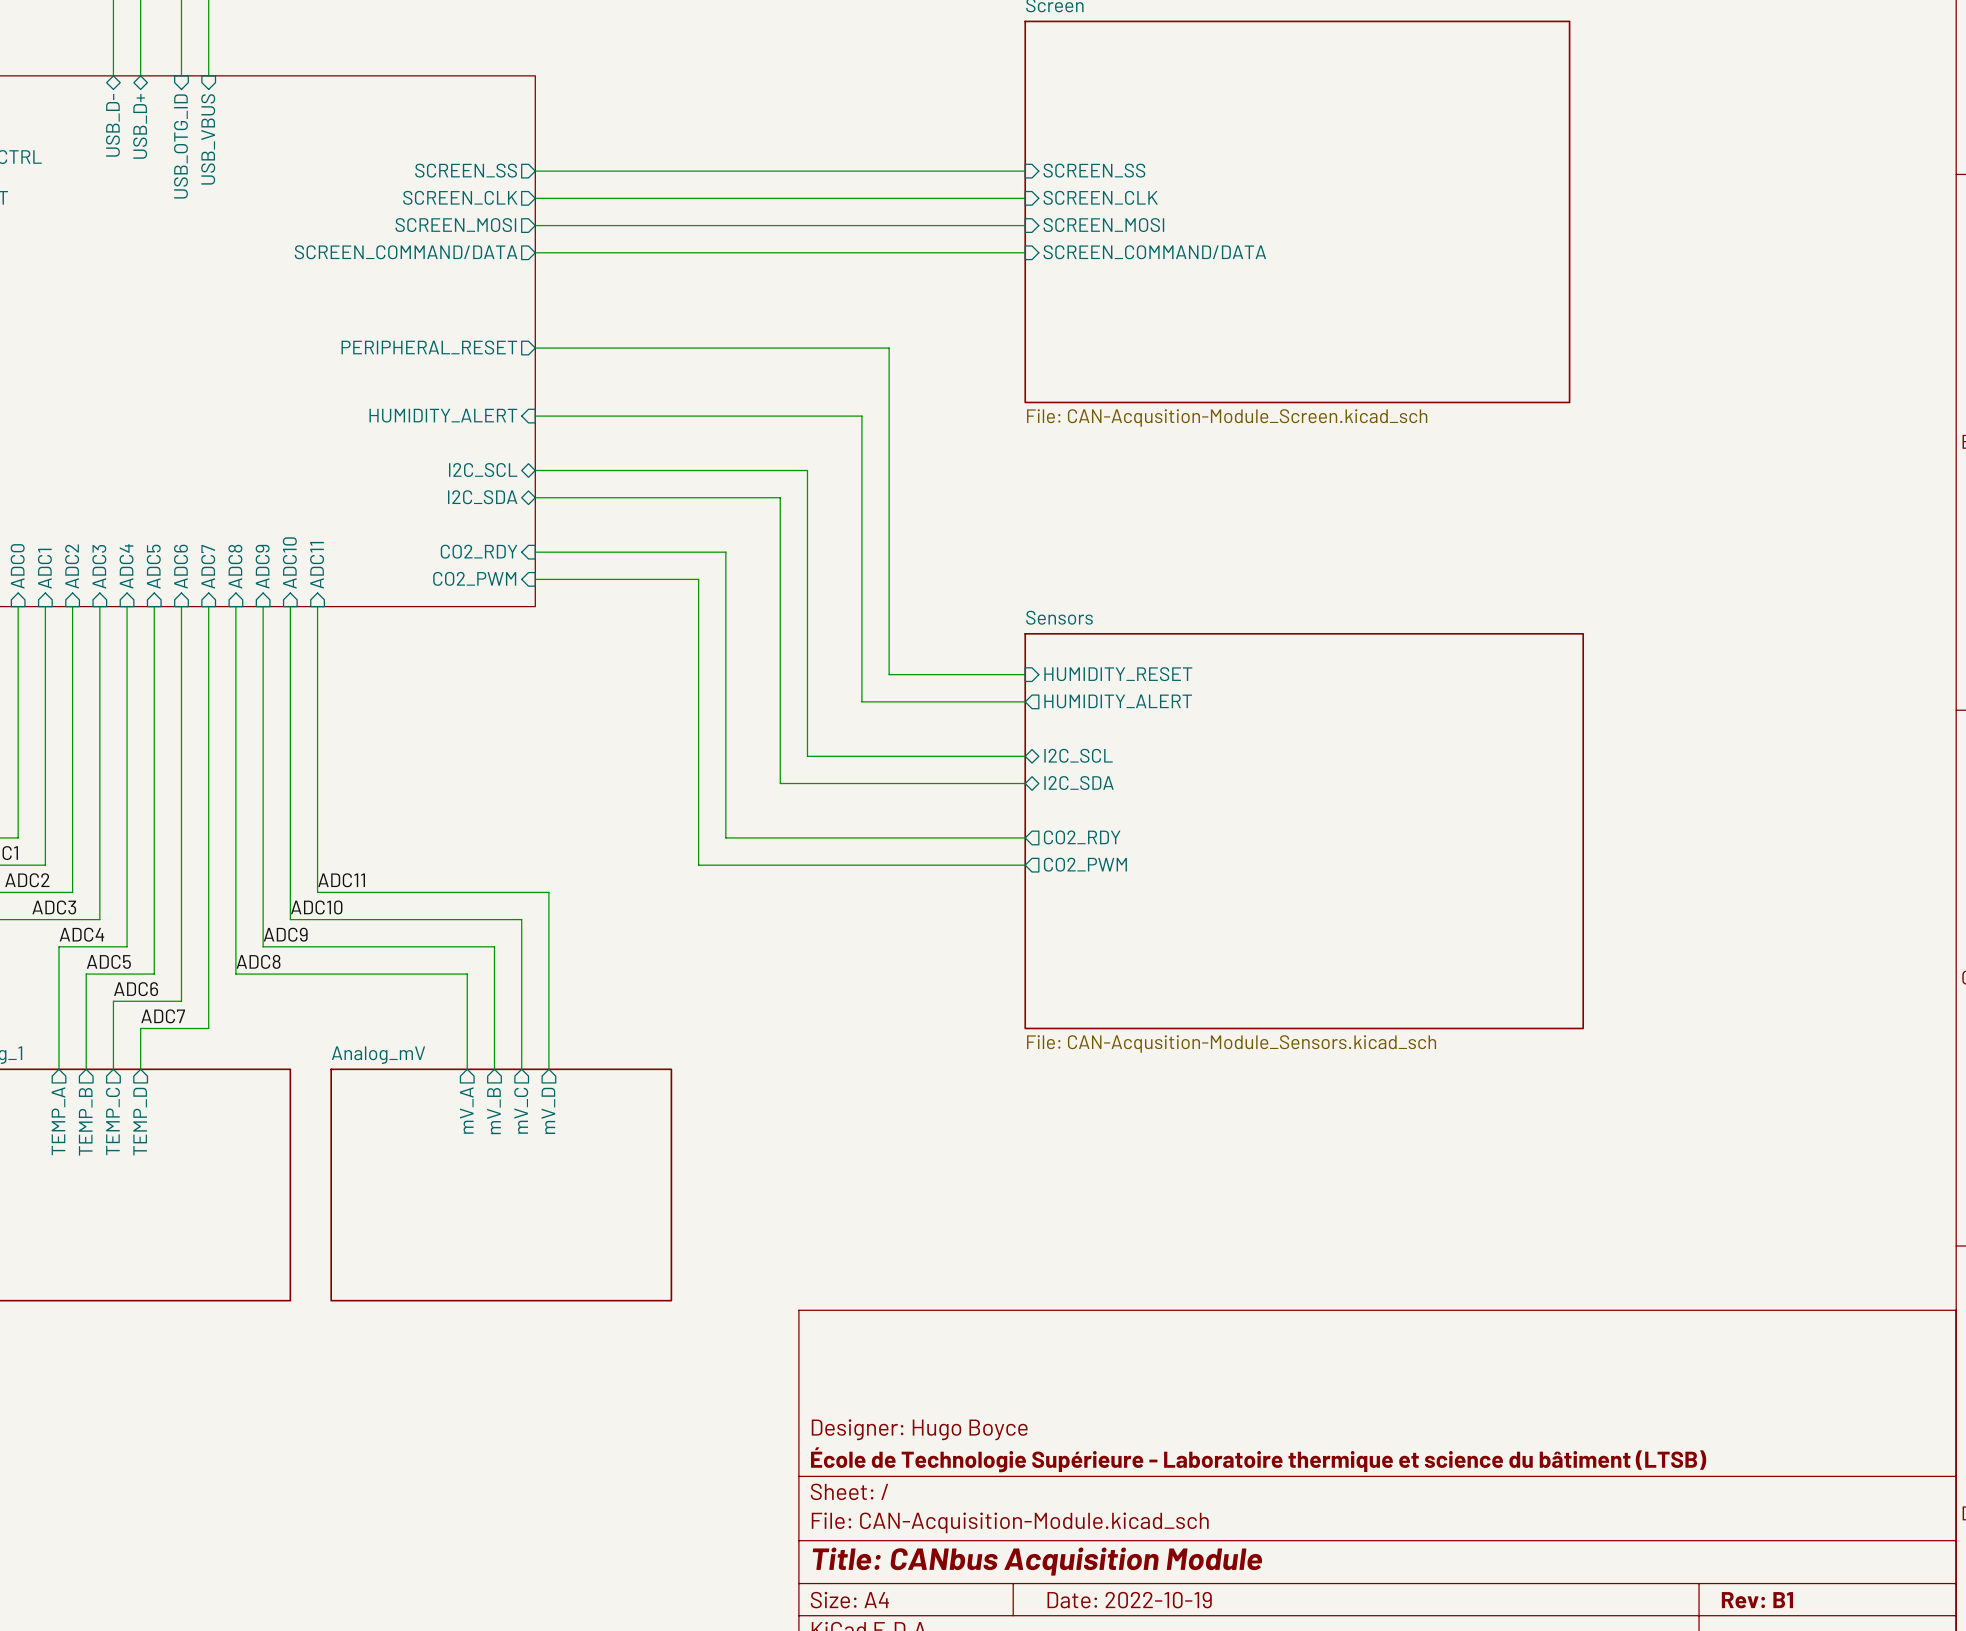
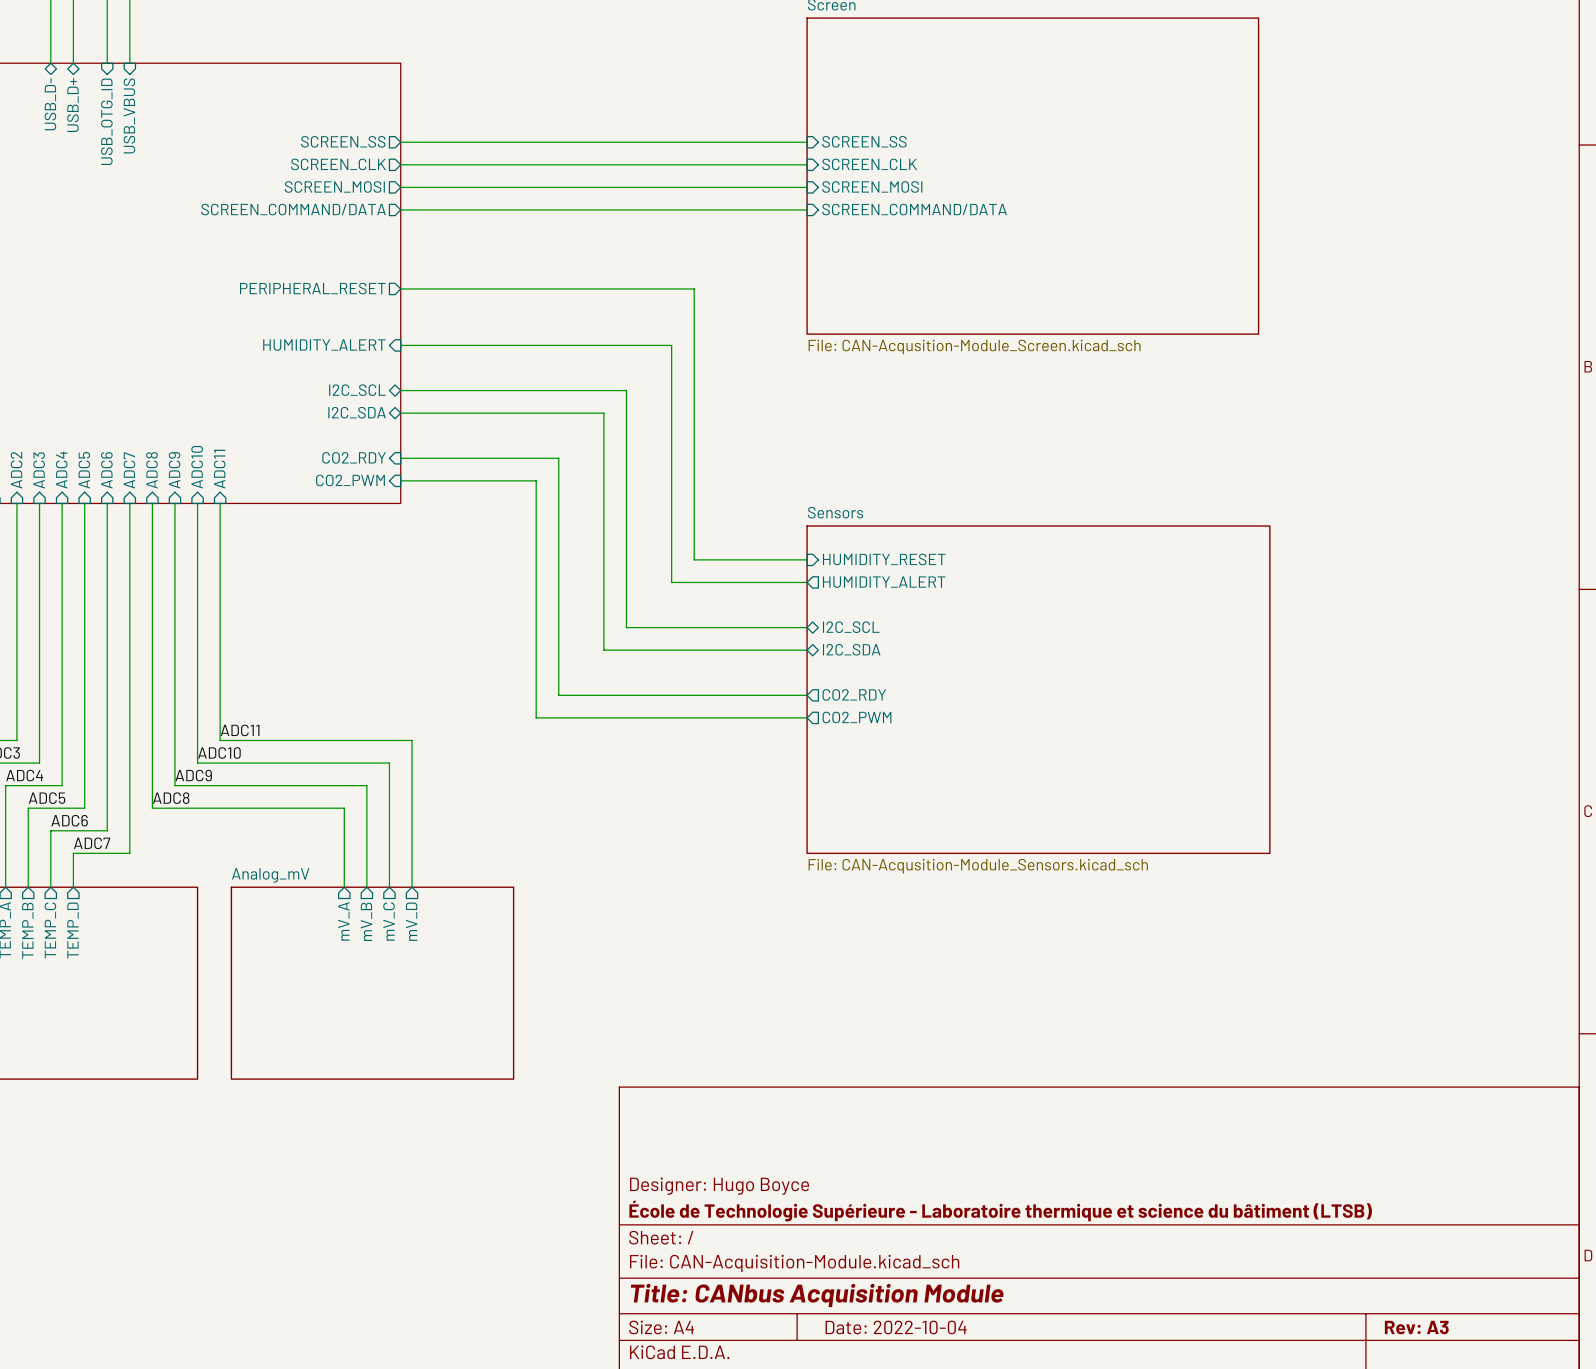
title block: Date: 2022-10-19 (1129, 1600) -> Date: 2022-10-04 (896, 1327)
title block: Rev: B1 (1757, 1600) -> Rev: A3 (1416, 1327)

